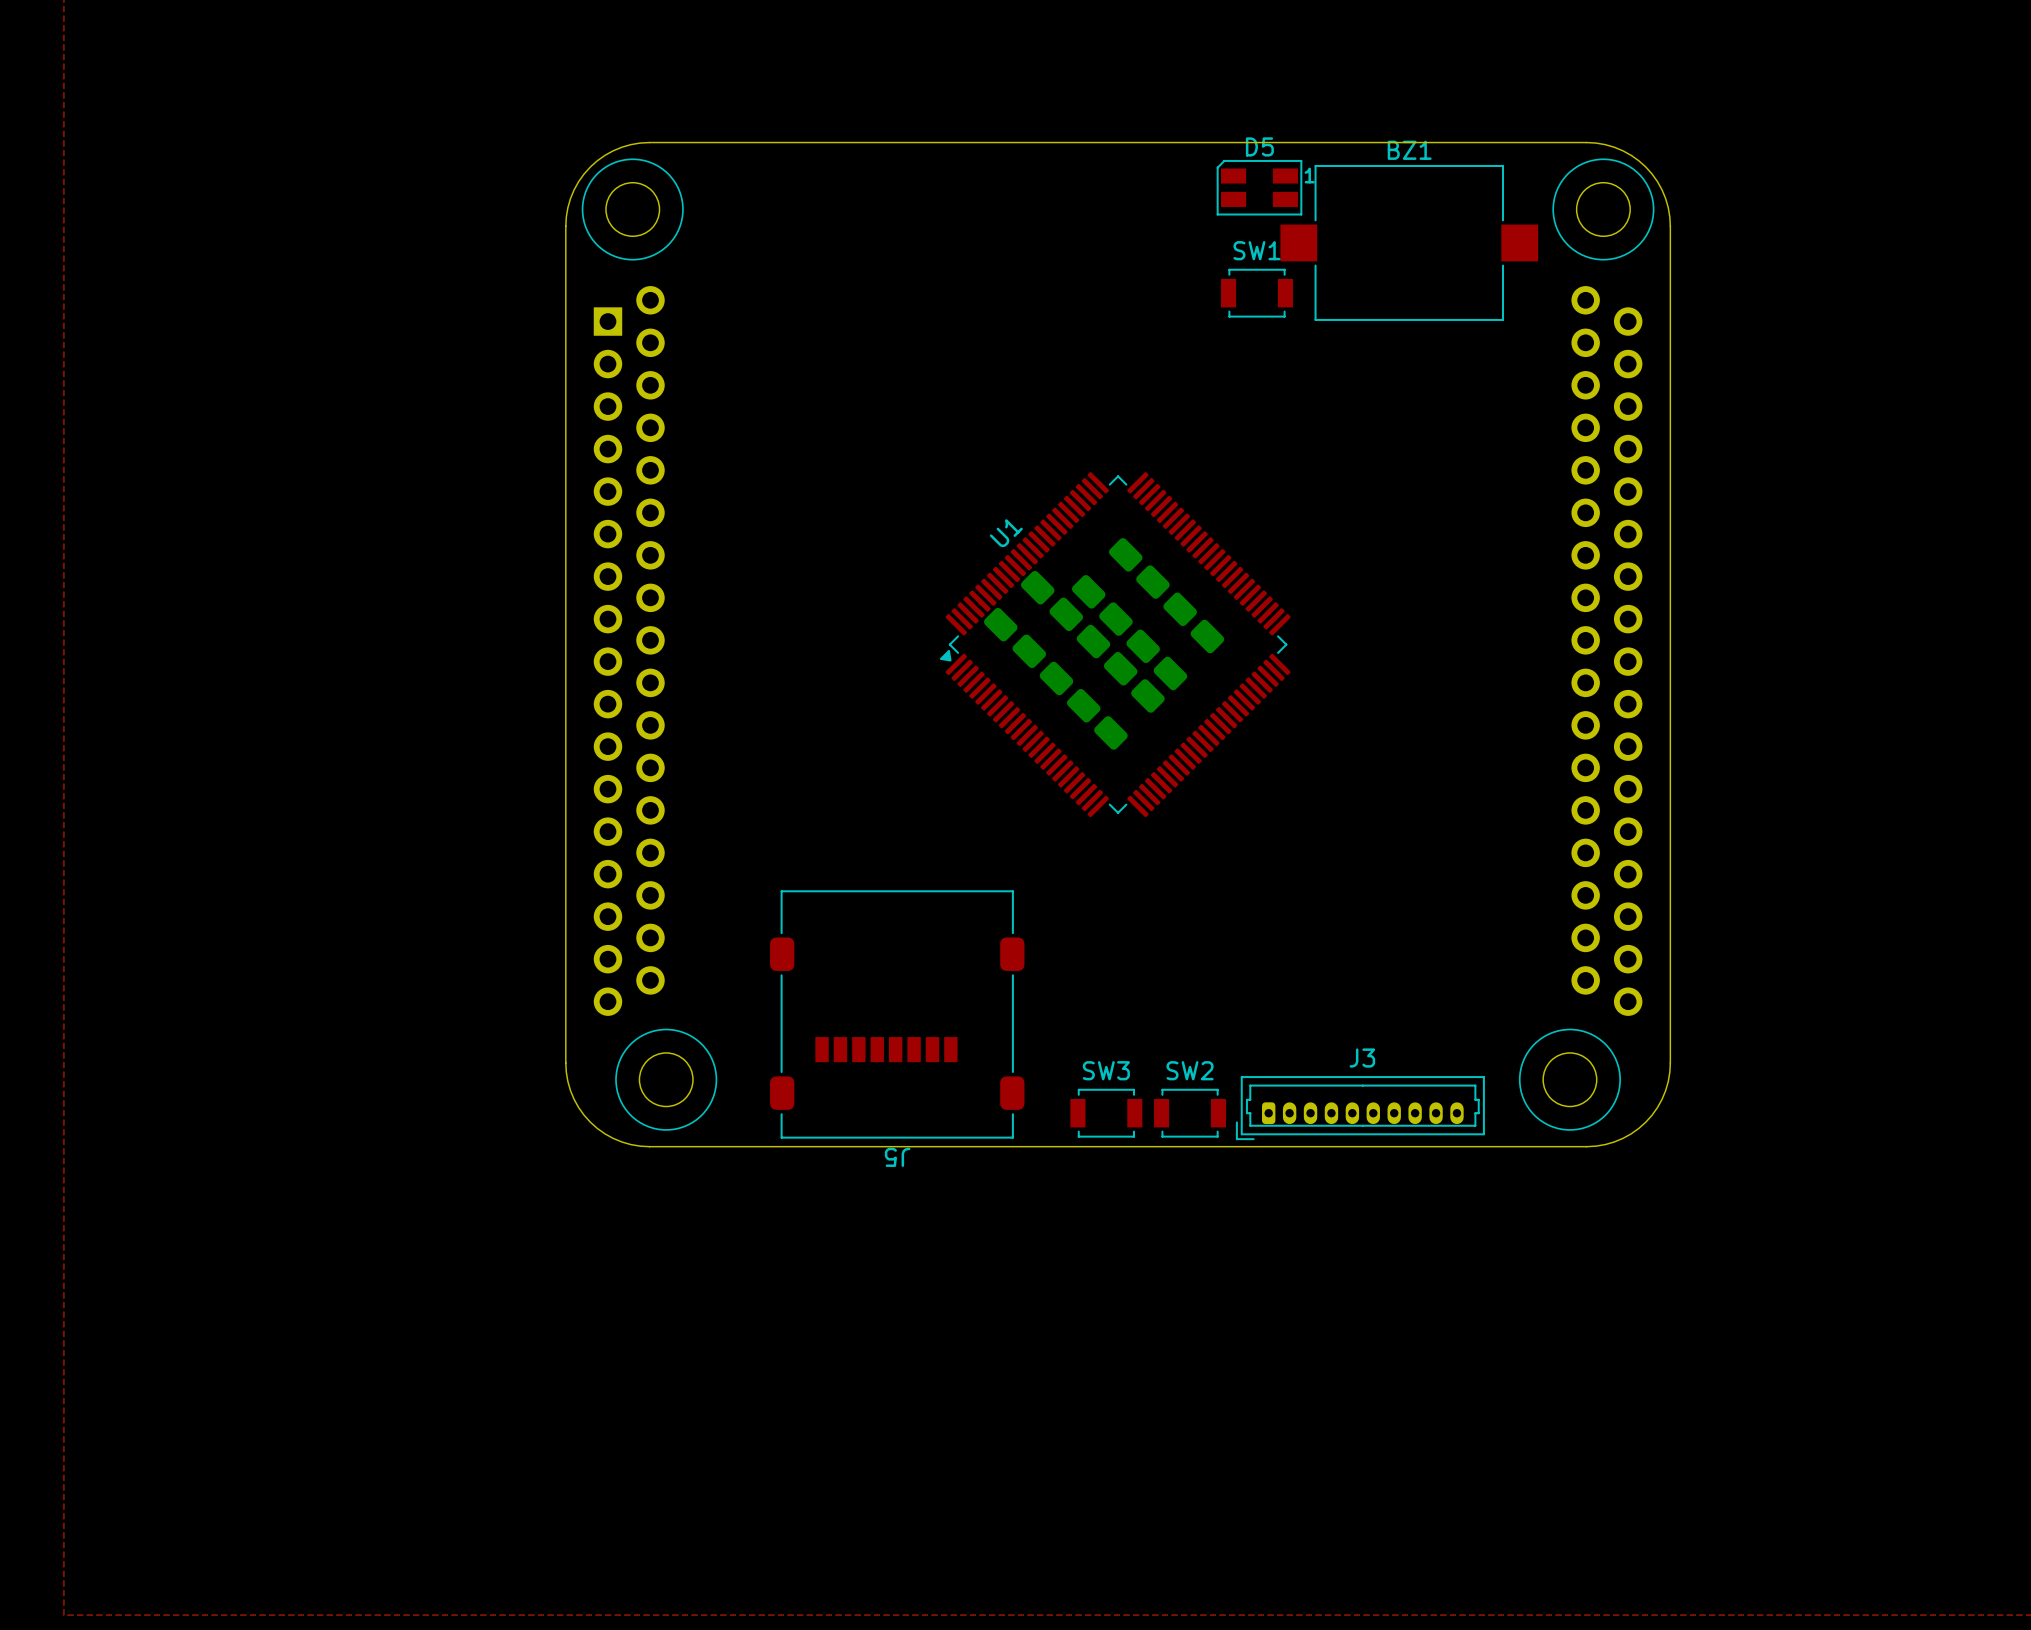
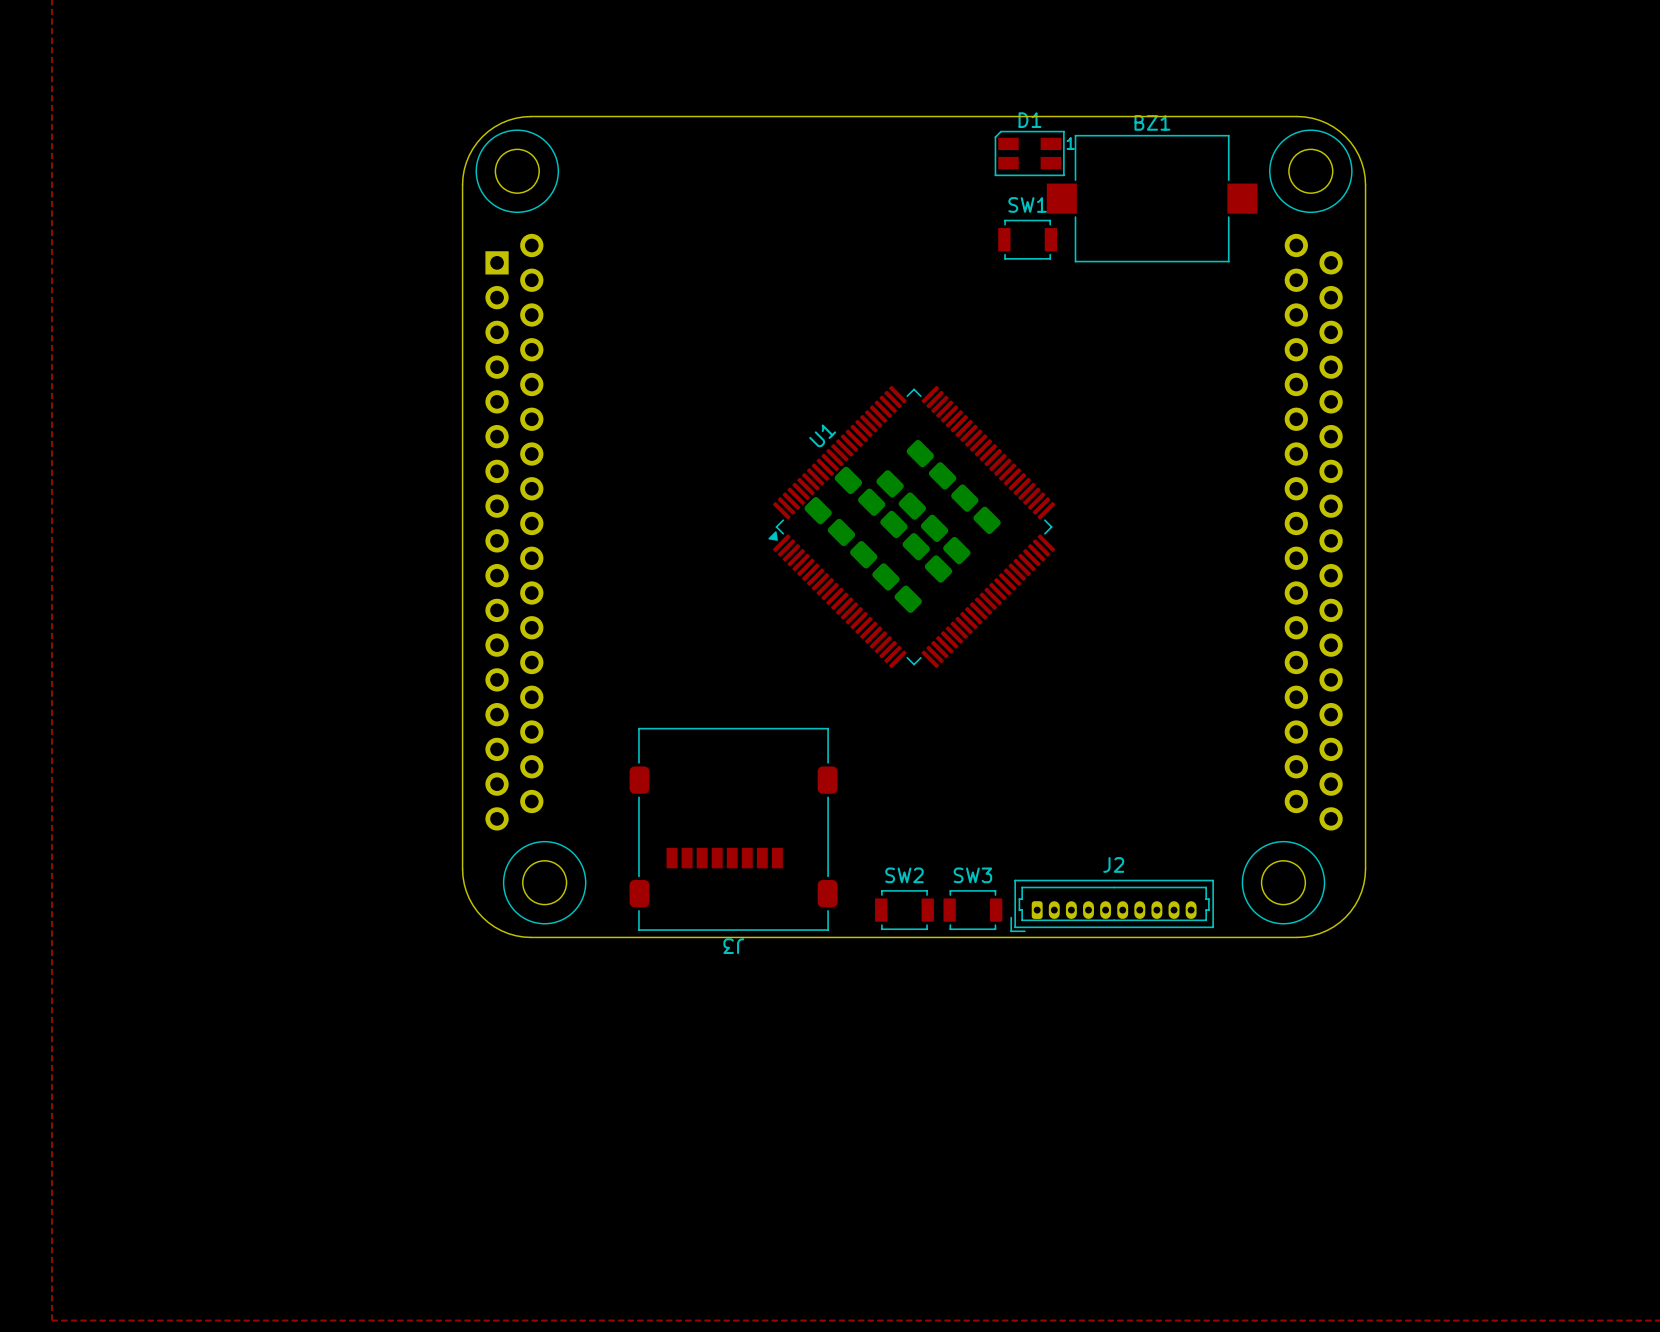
D5 name: D5 (1259, 146) -> D1 (1029, 120)
J3 name: J3 (1362, 1058) -> J2 (1113, 864)
SW3 name: SW3 (1106, 1070) -> SW2 (904, 875)
SW2 name: SW2 (1190, 1070) -> SW3 (972, 875)
J5 name: J5 (897, 1157) -> J3 (733, 946)

